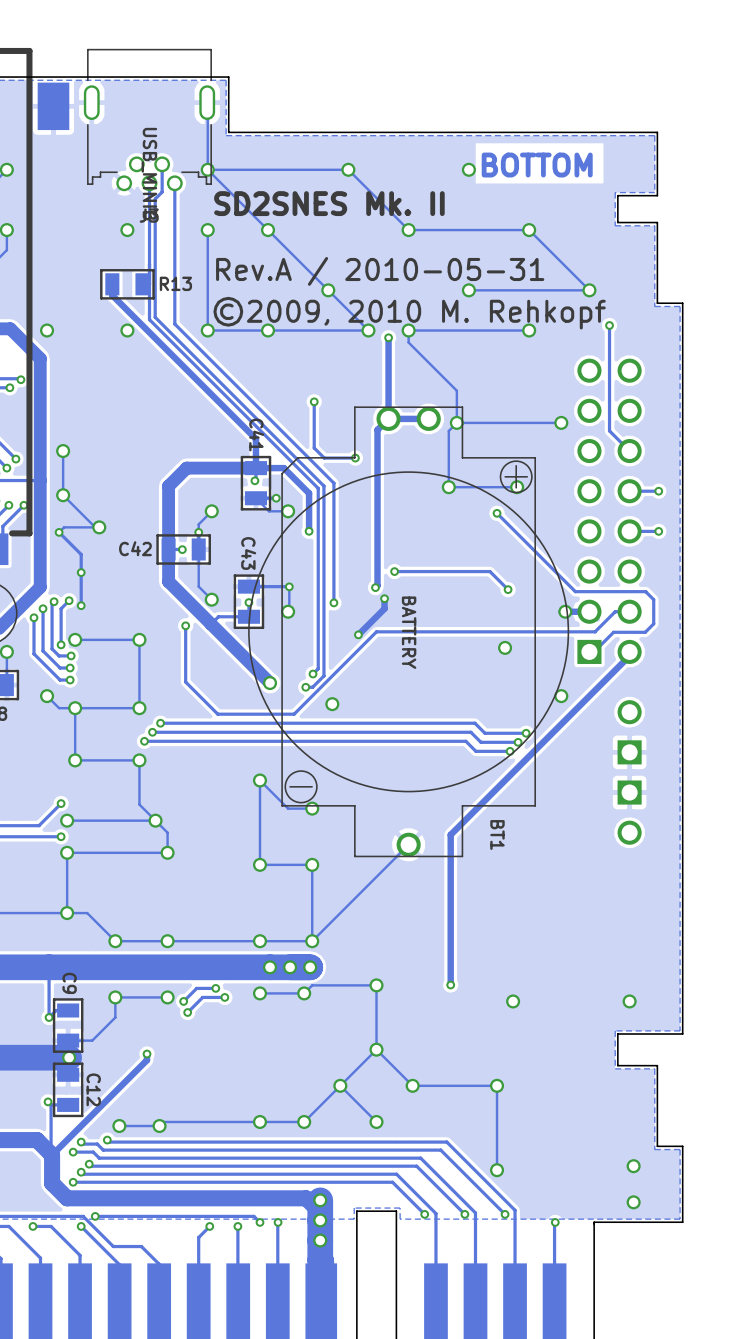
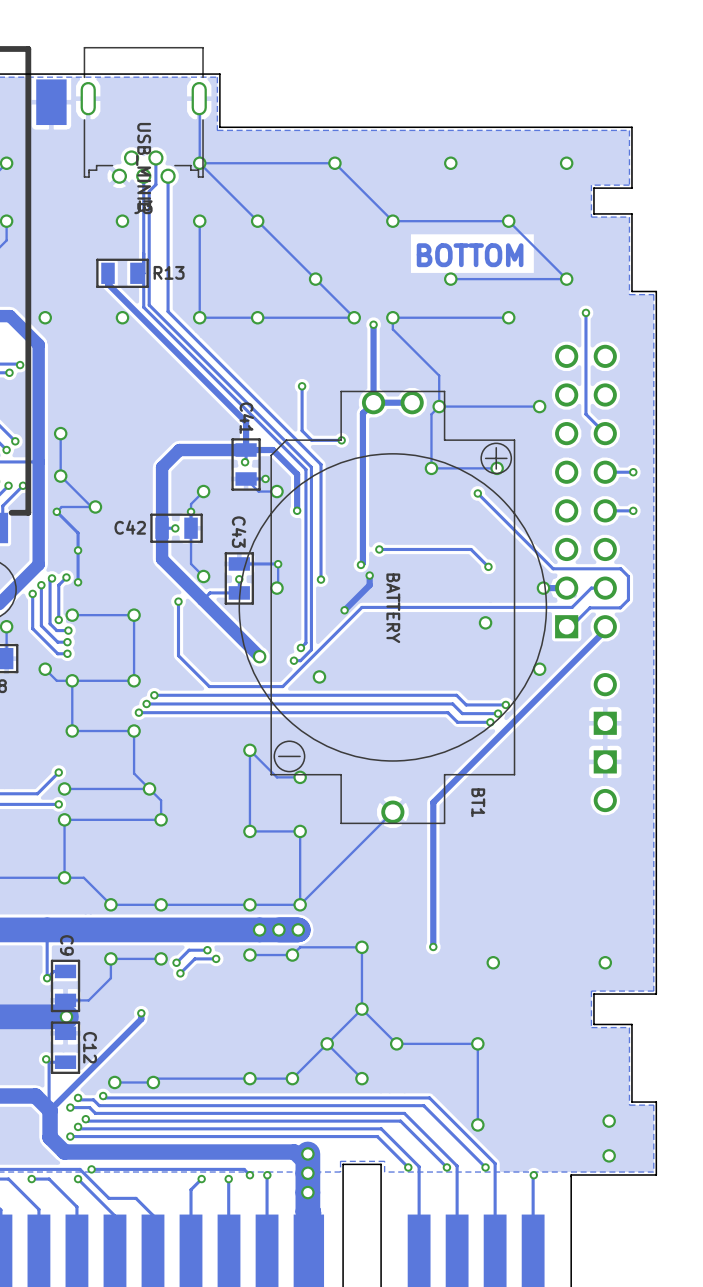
text position: BOTTOM (537, 165) -> BOTTOM (470, 255)
via: none -> (566, 163)
text: SD2SNES Mk. II (329, 203) -> none
text: Rev.A / 2010-05-31 (380, 271) -> none
text: ©2009, 2010 M. Rehkopf (409, 313) -> none

